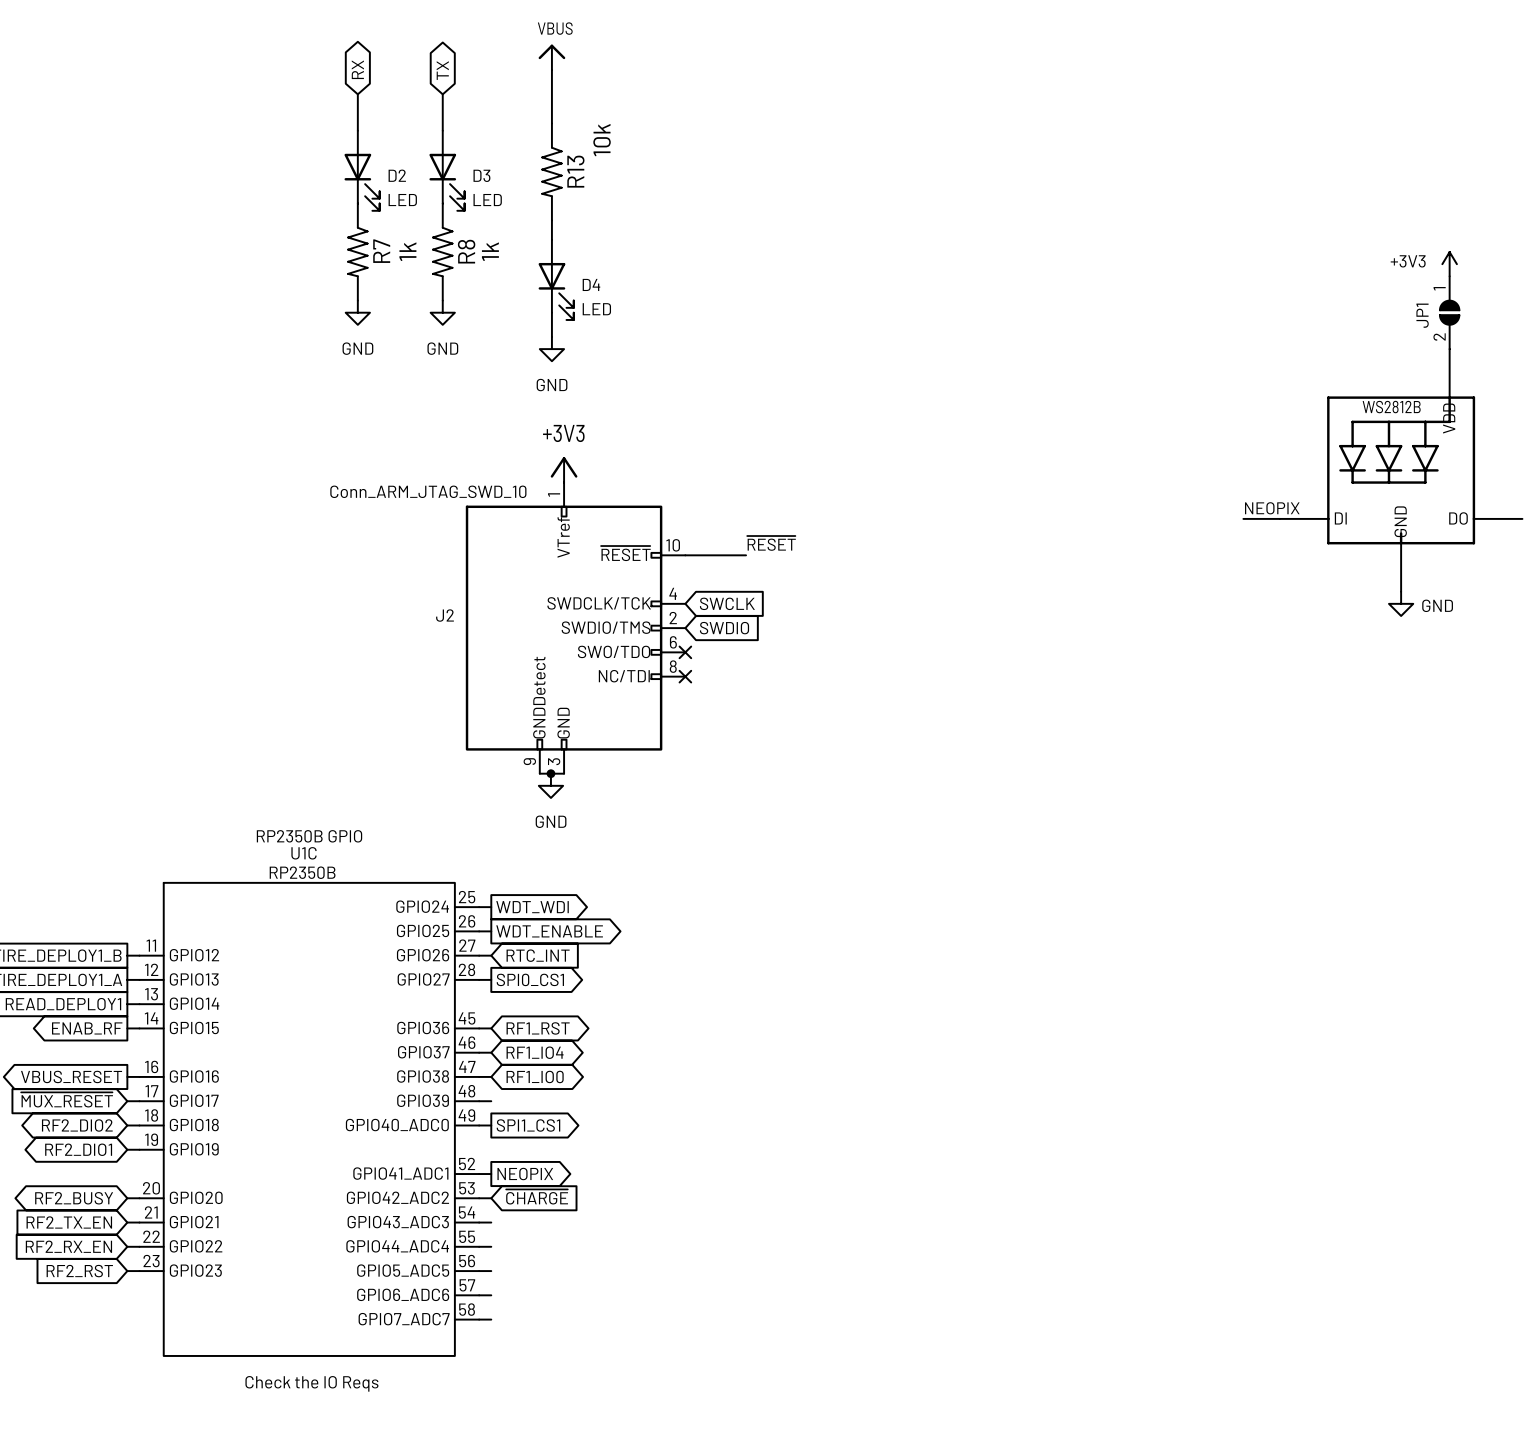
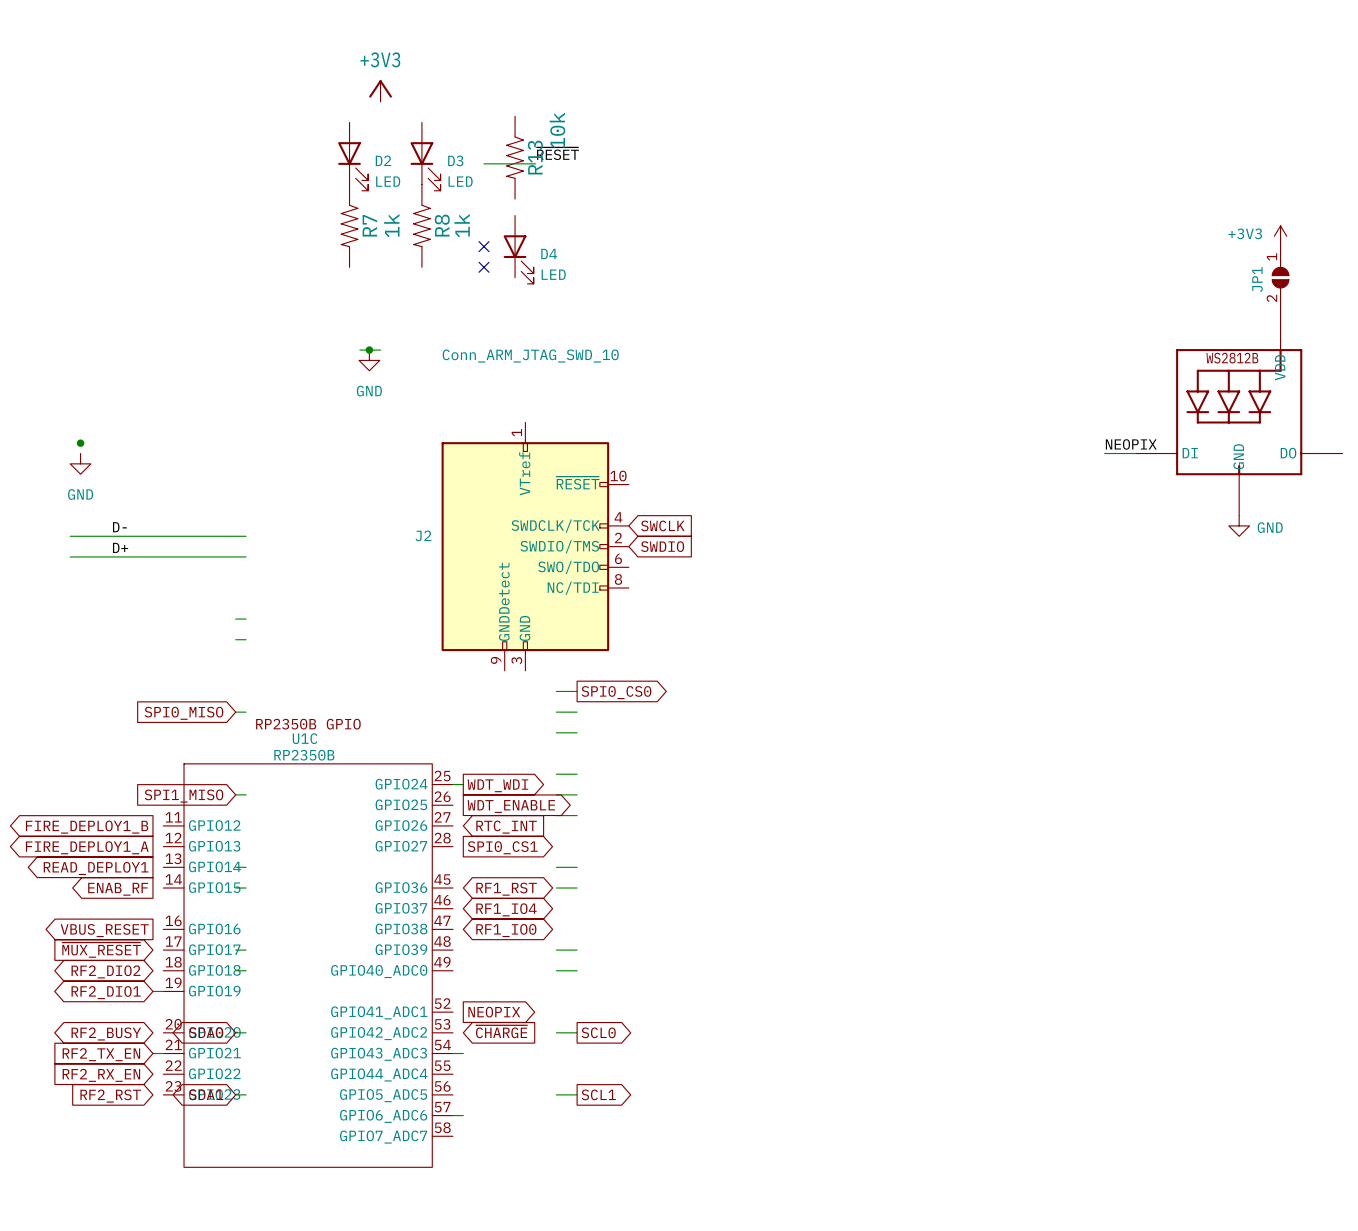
power symbol: VBUS (551, 57) -> none
global label: RX (357, 69) -> none
global label: TX (442, 70) -> none
wire: (551, 70) (551, 123) -> none
power symbol: none -> +3V3 (380, 90)
wire: (357, 94) (357, 130) -> none
wire: (442, 94) (442, 130) -> none
label: none -> ~{RESET} (557, 153)
wire: none -> (484, 163) (535, 163)
wire: (551, 220) (551, 239) -> none
no-connect mark: none -> (484, 246)
no-connect mark: none -> (484, 267)
power symbol: GND (357, 312) -> none
power symbol: GND (442, 312) -> none
wire: (551, 312) (551, 336) -> none
power symbol: GND (551, 349) -> none
wire: none -> (359, 350) (380, 350)
junction: none -> (369, 350)
power symbol: none -> GND (369, 360)
power symbol: +3V3 (564, 469) -> none
J2 value position: Conn_ARM_JTAG_SWD_10 (428, 491) -> Conn_ARM_JTAG_SWD_10 (530, 356)
junction: none -> (80, 443)
power symbol: none -> GND (80, 463)
label: ~{RESET} (771, 543) -> none
wire: (685, 555) (746, 555) -> none
label: none -> D- (119, 527)
wire: none -> (70, 536) (246, 536)
label: none -> D+ (120, 547)
wire: none -> (70, 556) (246, 556)
no-connect mark: (685, 652) -> none
no-connect mark: (685, 676) -> none
wire: none -> (235, 619) (246, 619)
wire: none -> (235, 639) (246, 639)
wire: (539, 773) (564, 773) -> (556, 691) (577, 691)
junction: (550, 773) -> none
power symbol: GND (550, 785) -> none
global label: none -> SPI0_CS0 (616, 692)
global label: none -> SPI0_MISO (183, 713)
wire: none -> (556, 712) (577, 712)
wire: none -> (556, 732) (577, 732)
wire: none -> (556, 774) (577, 774)
global label: none -> SPI1_MISO (183, 796)
wire: none -> (556, 794) (577, 794)
wire: (479, 931) (491, 931) -> none
wire: none -> (556, 815) (577, 815)
wire: (127, 955) (139, 955) -> none
wire: (479, 955) (491, 955) -> none
wire: (127, 979) (139, 979) -> (235, 712) (246, 712)
wire: (479, 979) (491, 979) -> none
wire: (127, 1004) (139, 1004) -> (235, 867) (246, 867)
wire: none -> (556, 867) (577, 867)
wire: (127, 1028) (139, 1028) -> (235, 888) (246, 888)
wire: (479, 1028) (491, 1028) -> none
wire: none -> (556, 888) (577, 888)
wire: (479, 1052) (491, 1052) -> none
wire: (127, 1076) (139, 1076) -> (235, 794) (246, 794)
wire: (479, 1076) (491, 1076) -> none
wire: (127, 1101) (139, 1101) -> (235, 950) (246, 950)
wire: (479, 1101) (491, 1101) -> none
wire: none -> (556, 950) (577, 950)
wire: (127, 1125) (139, 1125) -> (235, 970) (246, 970)
wire: (479, 1125) (491, 1125) -> none
global label: SPI1_CS1 (528, 1125) -> none
wire: none -> (556, 970) (577, 970)
wire: (479, 1174) (491, 1174) -> none
wire: (127, 1198) (139, 1198) -> (235, 1032) (246, 1032)
global label: none -> SDA0 (206, 1032)
wire: (479, 1198) (491, 1198) -> none
wire: none -> (556, 1032) (577, 1032)
global label: none -> SCL0 (598, 1032)
wire: (127, 1246) (139, 1246) -> none
wire: (479, 1246) (491, 1246) -> none
wire: (127, 1271) (139, 1271) -> (235, 1094) (246, 1094)
global label: none -> SDA1 (206, 1094)
wire: (479, 1271) (491, 1271) -> none
wire: none -> (556, 1094) (577, 1094)
global label: none -> SCL1 (598, 1094)
wire: (479, 1319) (491, 1319) -> none
text: Check the IO Reqs (311, 1383) -> none

